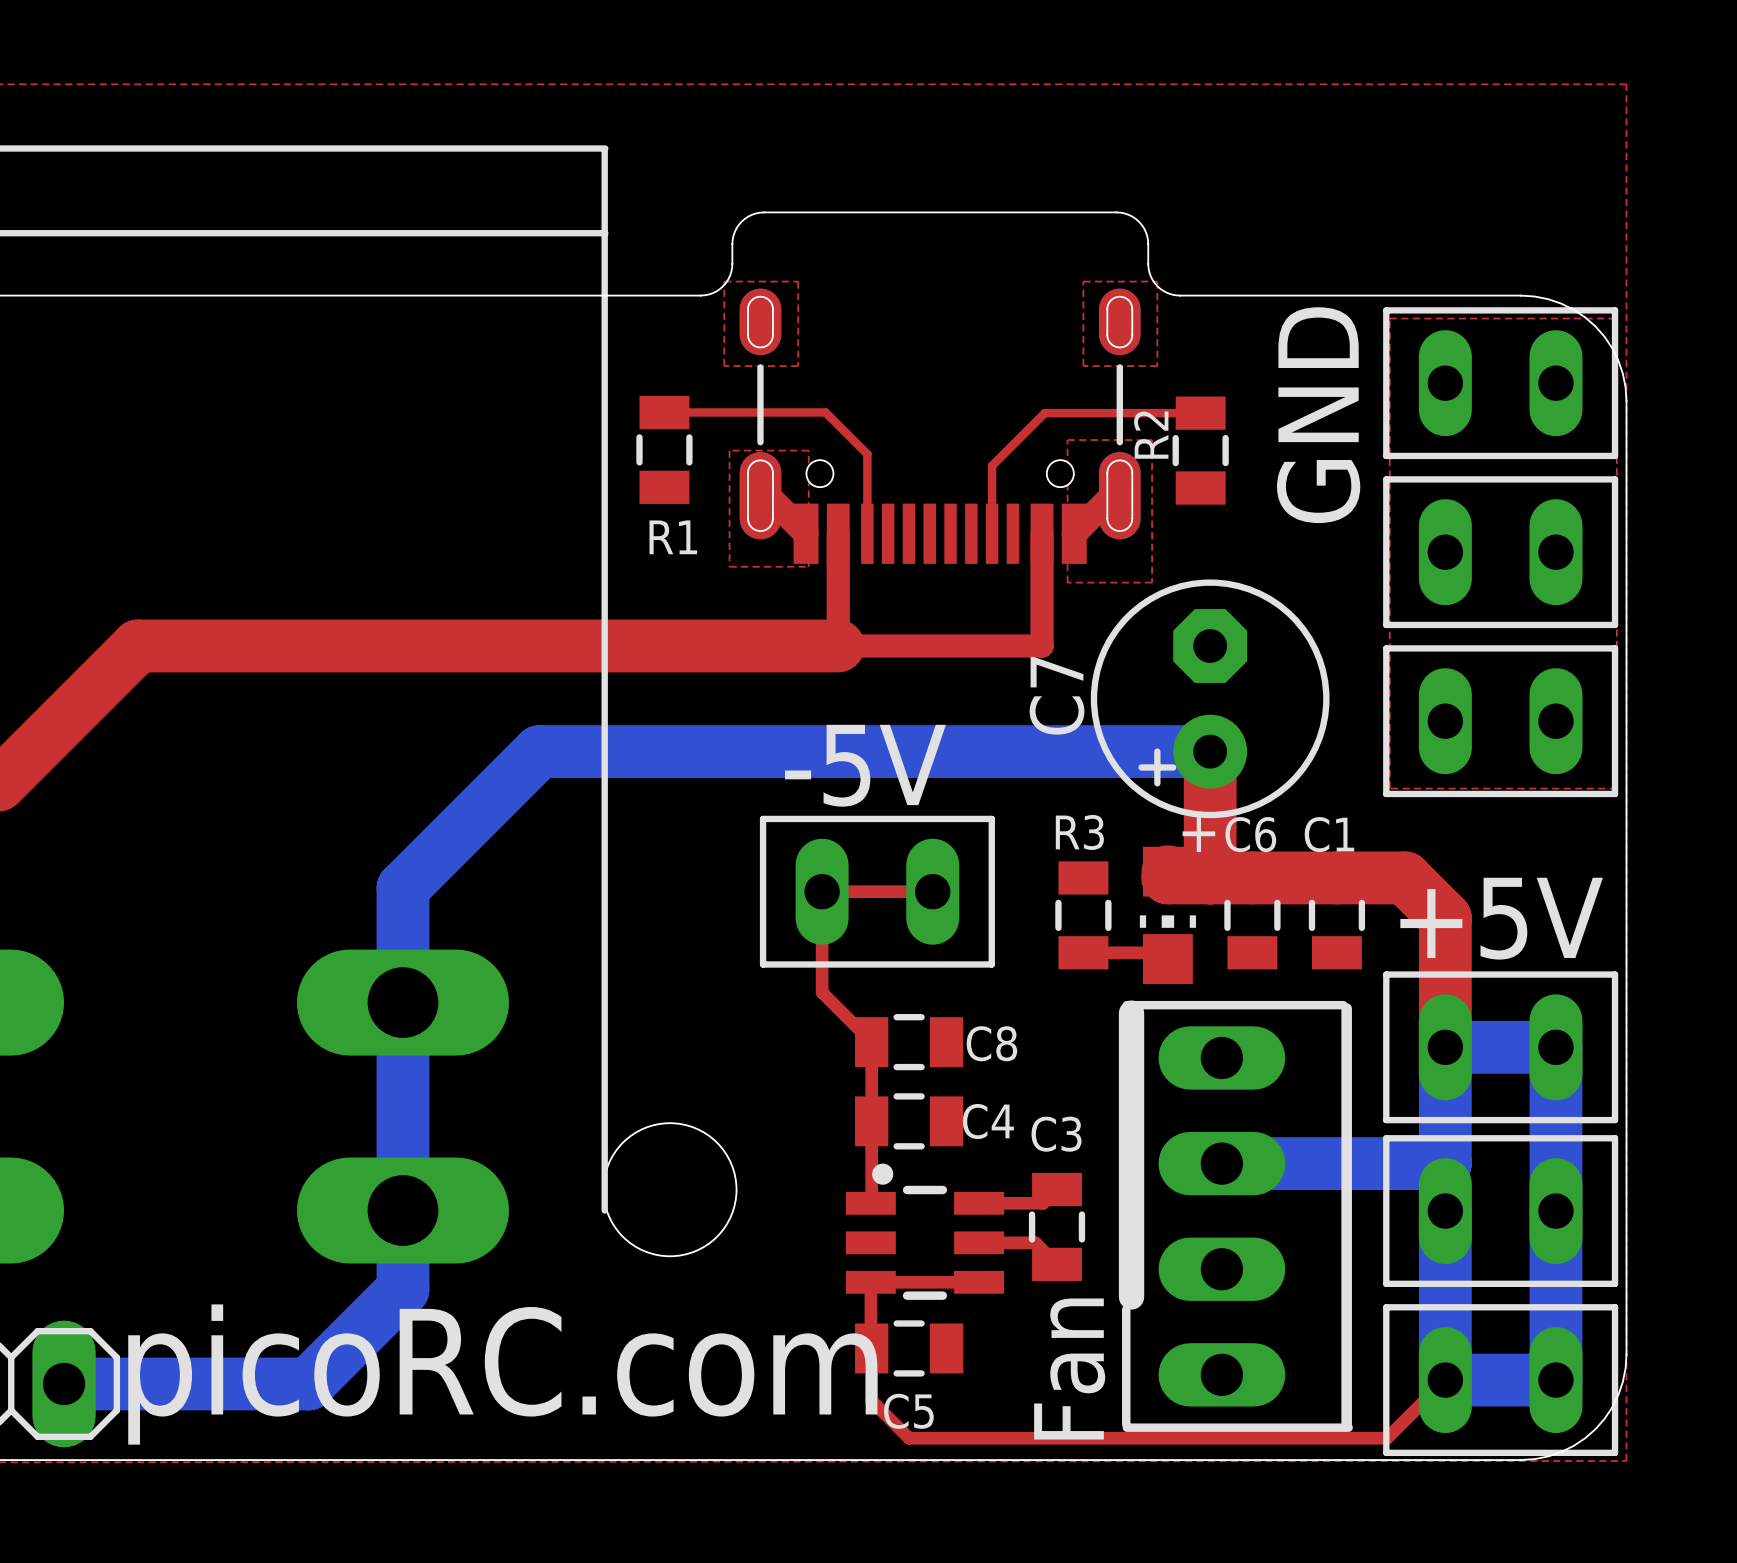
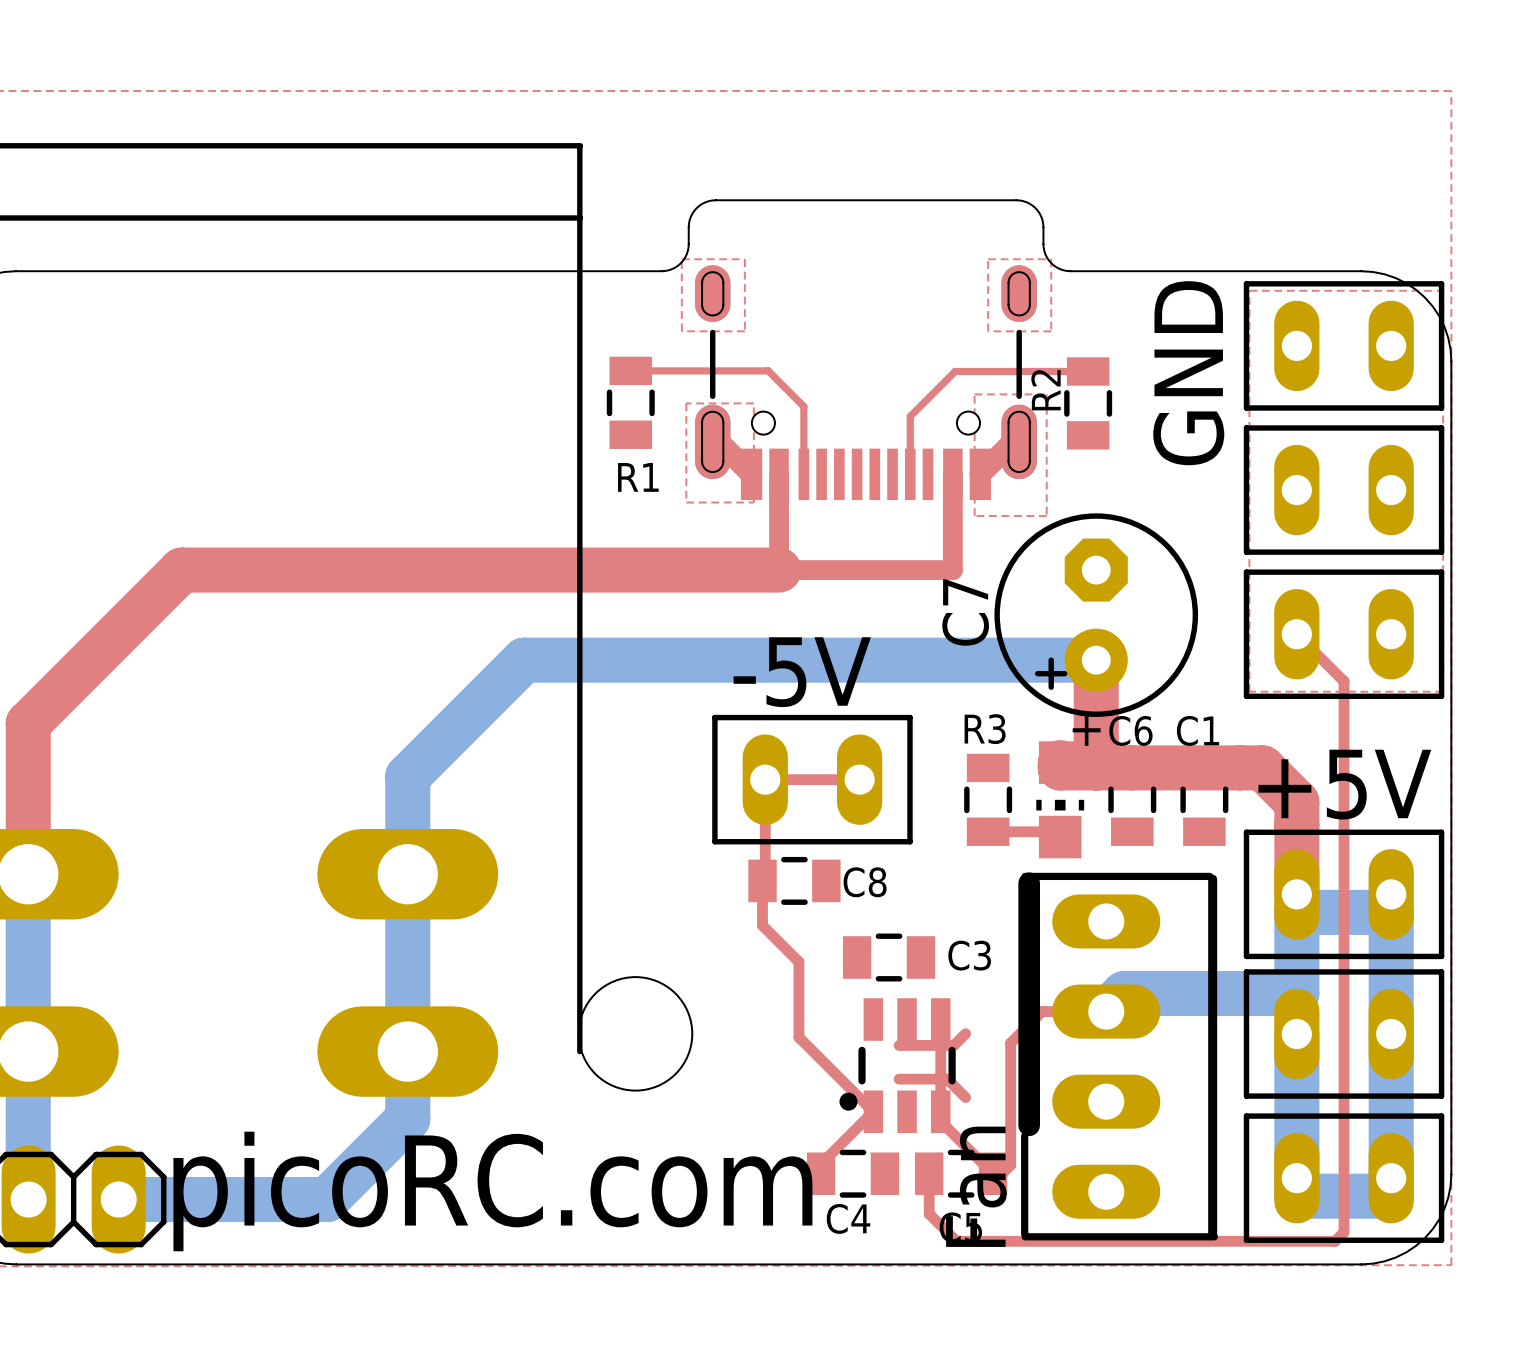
top track: none -> (1296, 634) (1344, 681) (1344, 1232) (1335, 1241) (956, 1241) (929, 1213) (929, 1173)
text position: +5V (1501, 918) -> +5V (1344, 784)
top track: (822, 992) (871, 1042) (870, 1203) -> (765, 865) (765, 878) (762, 880) (762, 925) (798, 962) (798, 1037) (873, 1111) (821, 1164) (821, 1173)
C8 position: (909, 1042) -> (794, 880)
part position: (1500, 1047) -> (1344, 894)
C4 position: (909, 1121) -> (853, 1173)
C4 name position: C4 (988, 1121) -> C4 (848, 1218)
top track: none -> (1106, 1011) (1042, 1011) (1010, 1043) (1010, 1165) (1002, 1173) (993, 1173) (940, 1121) (940, 1019)
bottom track: (1221, 1163) (1445, 1163) -> (1106, 1011) (1124, 993) (1296, 993)
part position: (1500, 1211) -> (1344, 1034)
C3 rotation: 0° (1057, 1226) -> 90° clockwise (889, 957)
C3 position: (1057, 1226) -> (889, 957)
part rotation: 0° (924, 1231) -> 90° counterclockwise (897, 1065)
top track: (979, 1282) (870, 1282) (871, 1400) (909, 1438) (1387, 1438) (1445, 1380) -> none
C5 position: (909, 1348) -> (961, 1173)
part position: (1500, 1380) -> (1344, 1178)

